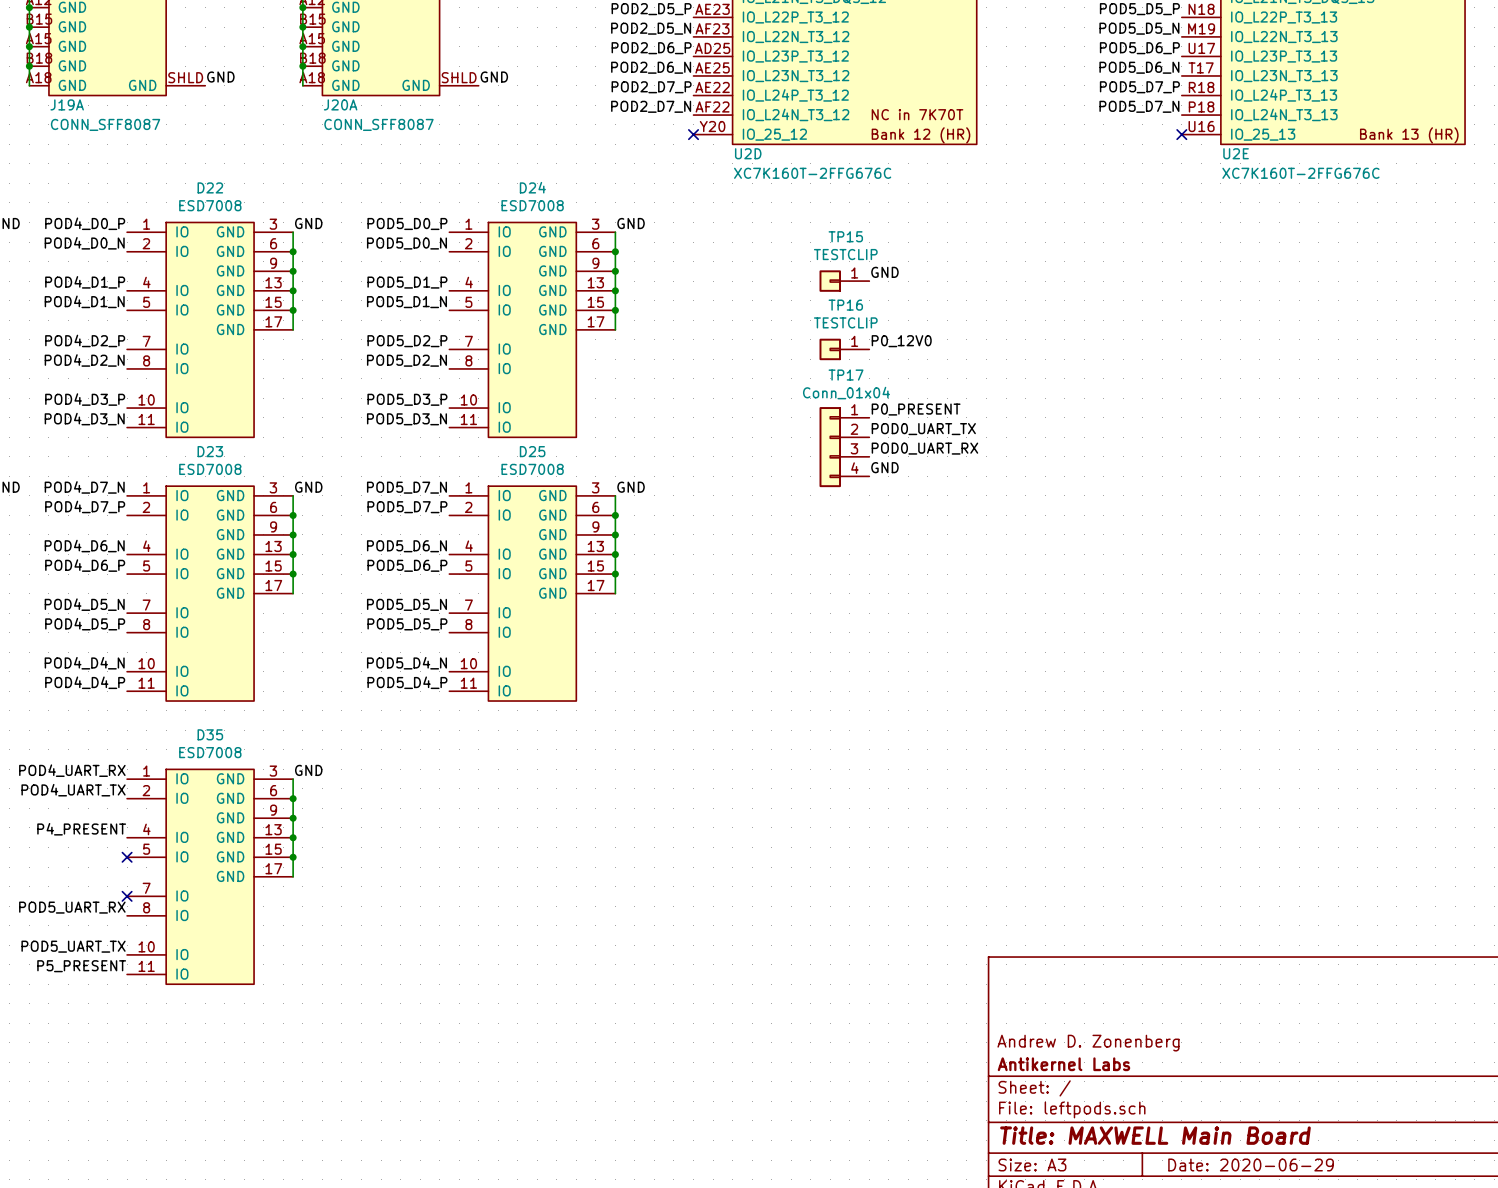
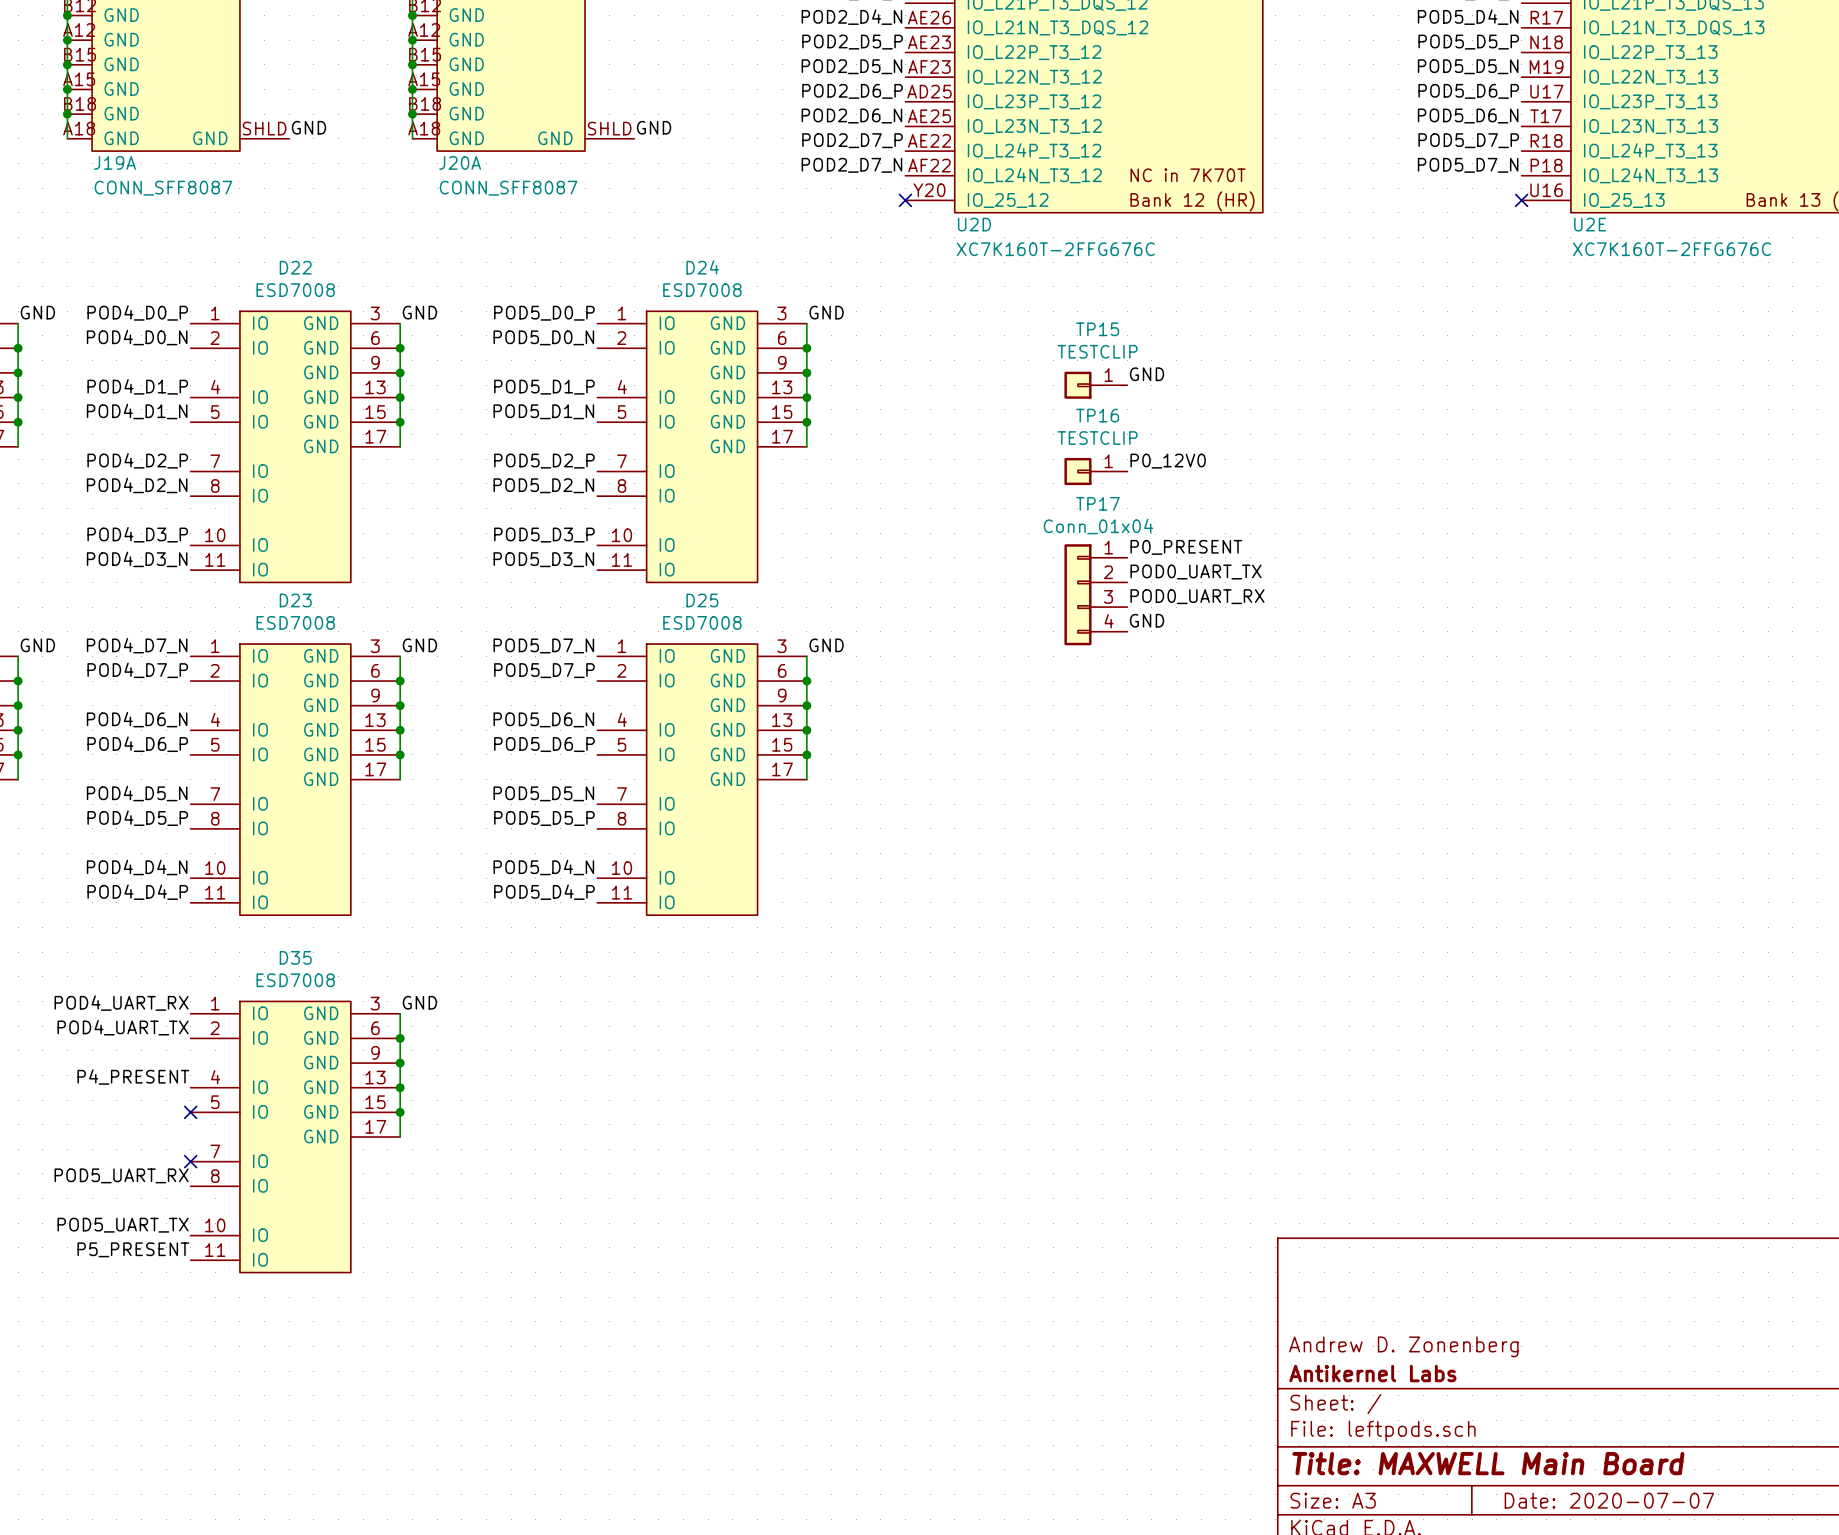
title block: Date: 2020-06-29 (1251, 1164) -> Date: 2020-07-07 (1609, 1500)

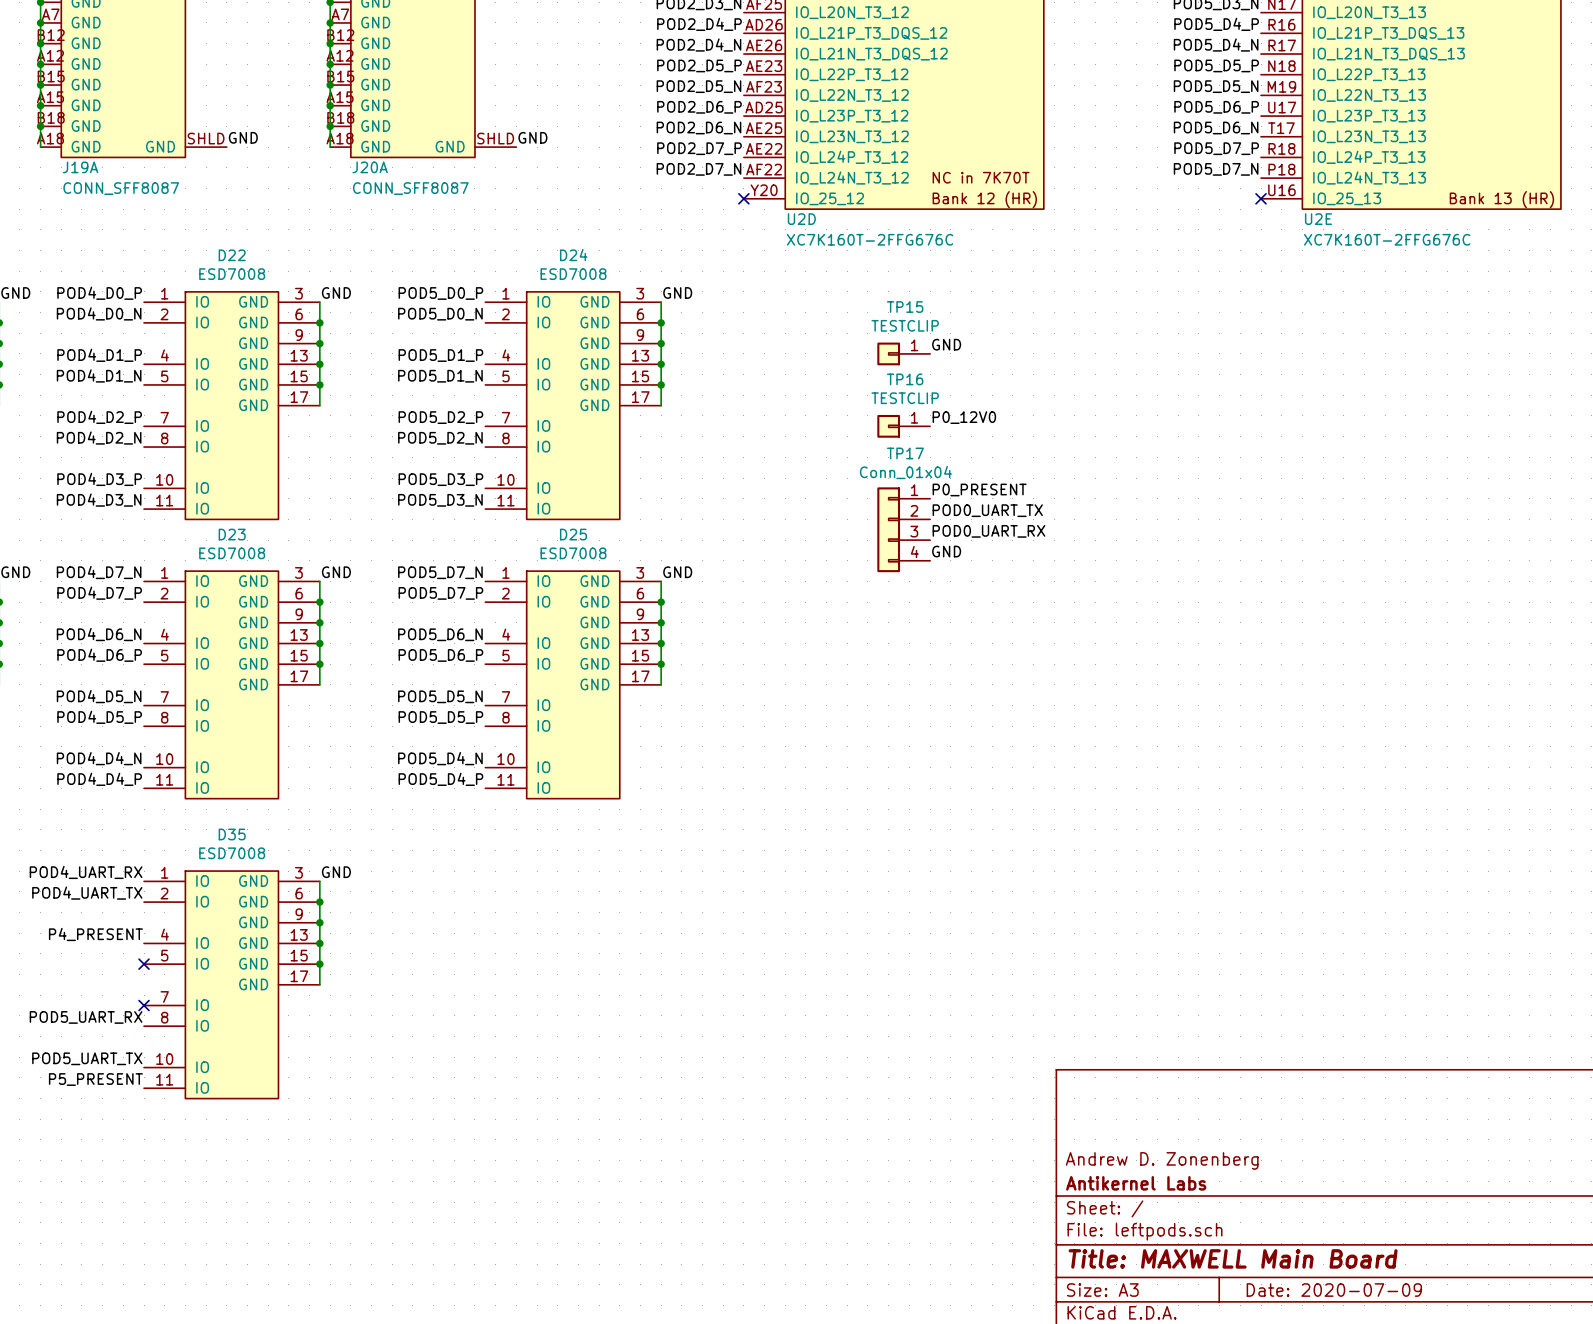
title block: Date: 2020-07-07 (1609, 1500) -> Date: 2020-07-09 (1334, 1290)

